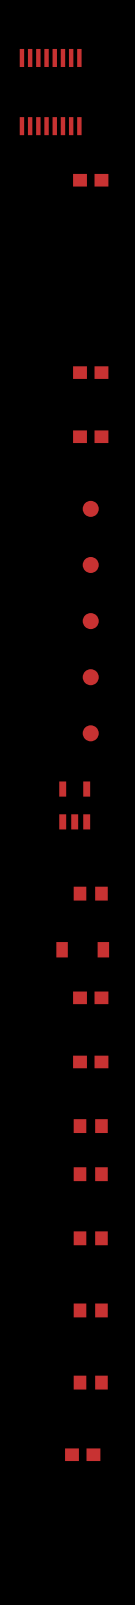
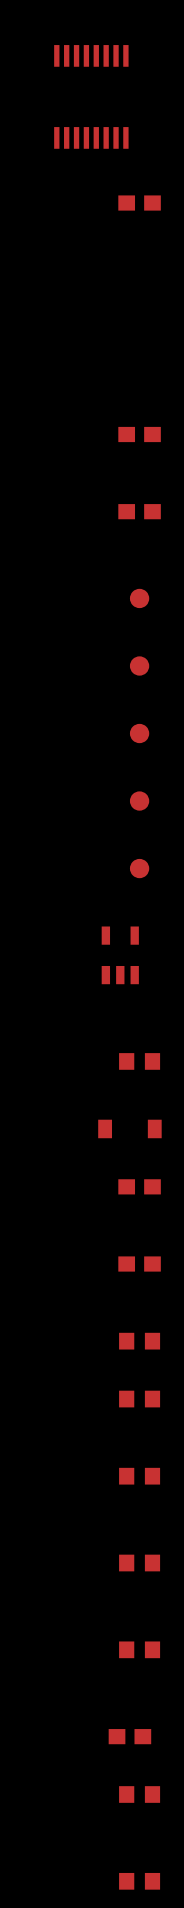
part: none -> (139, 1794)
part: none -> (139, 1881)

